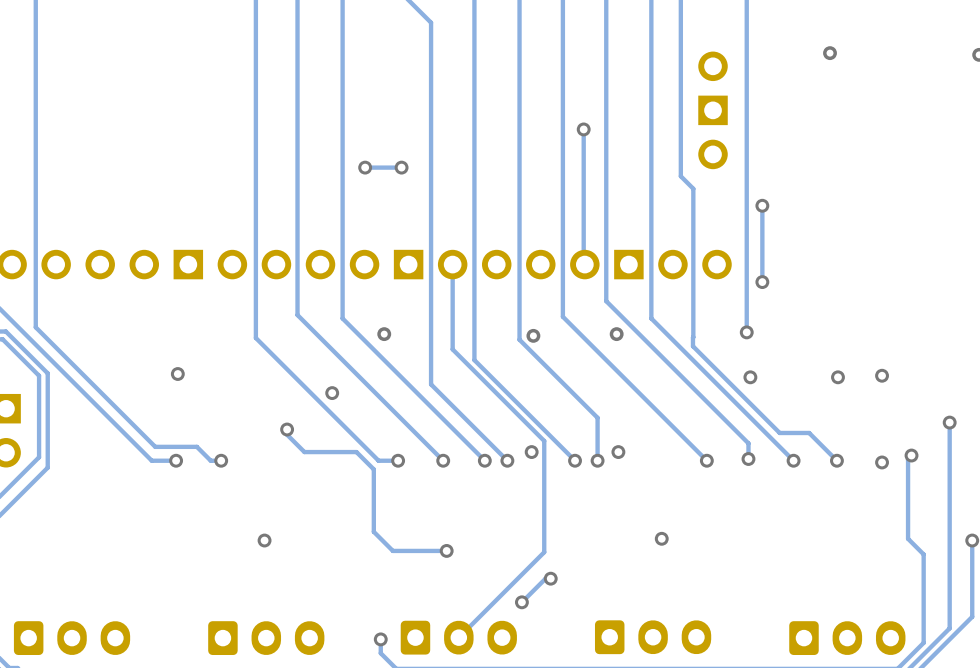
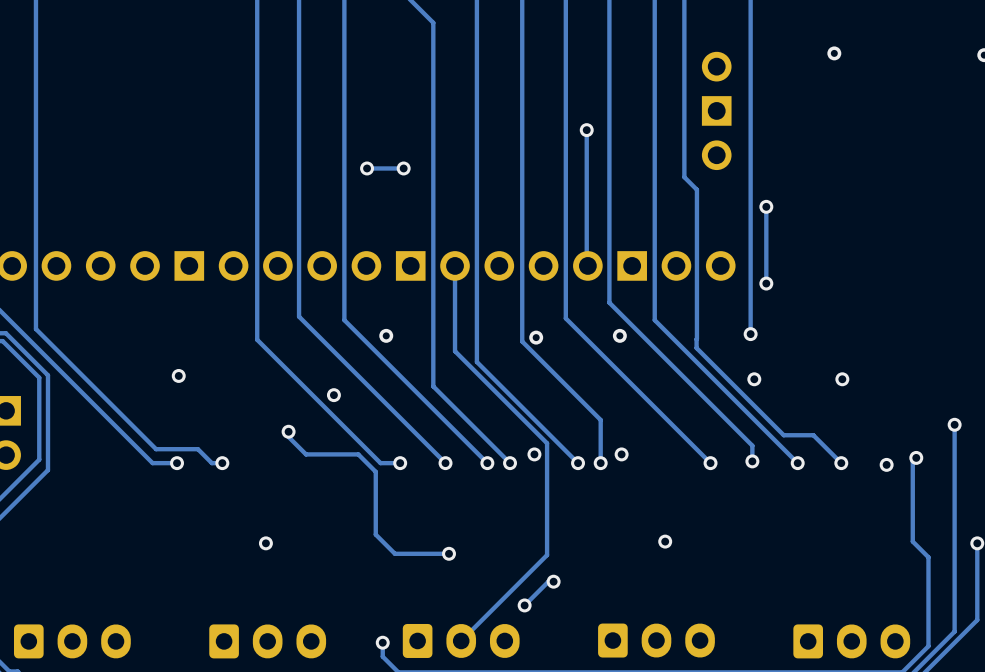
via: (882, 375) -> none

